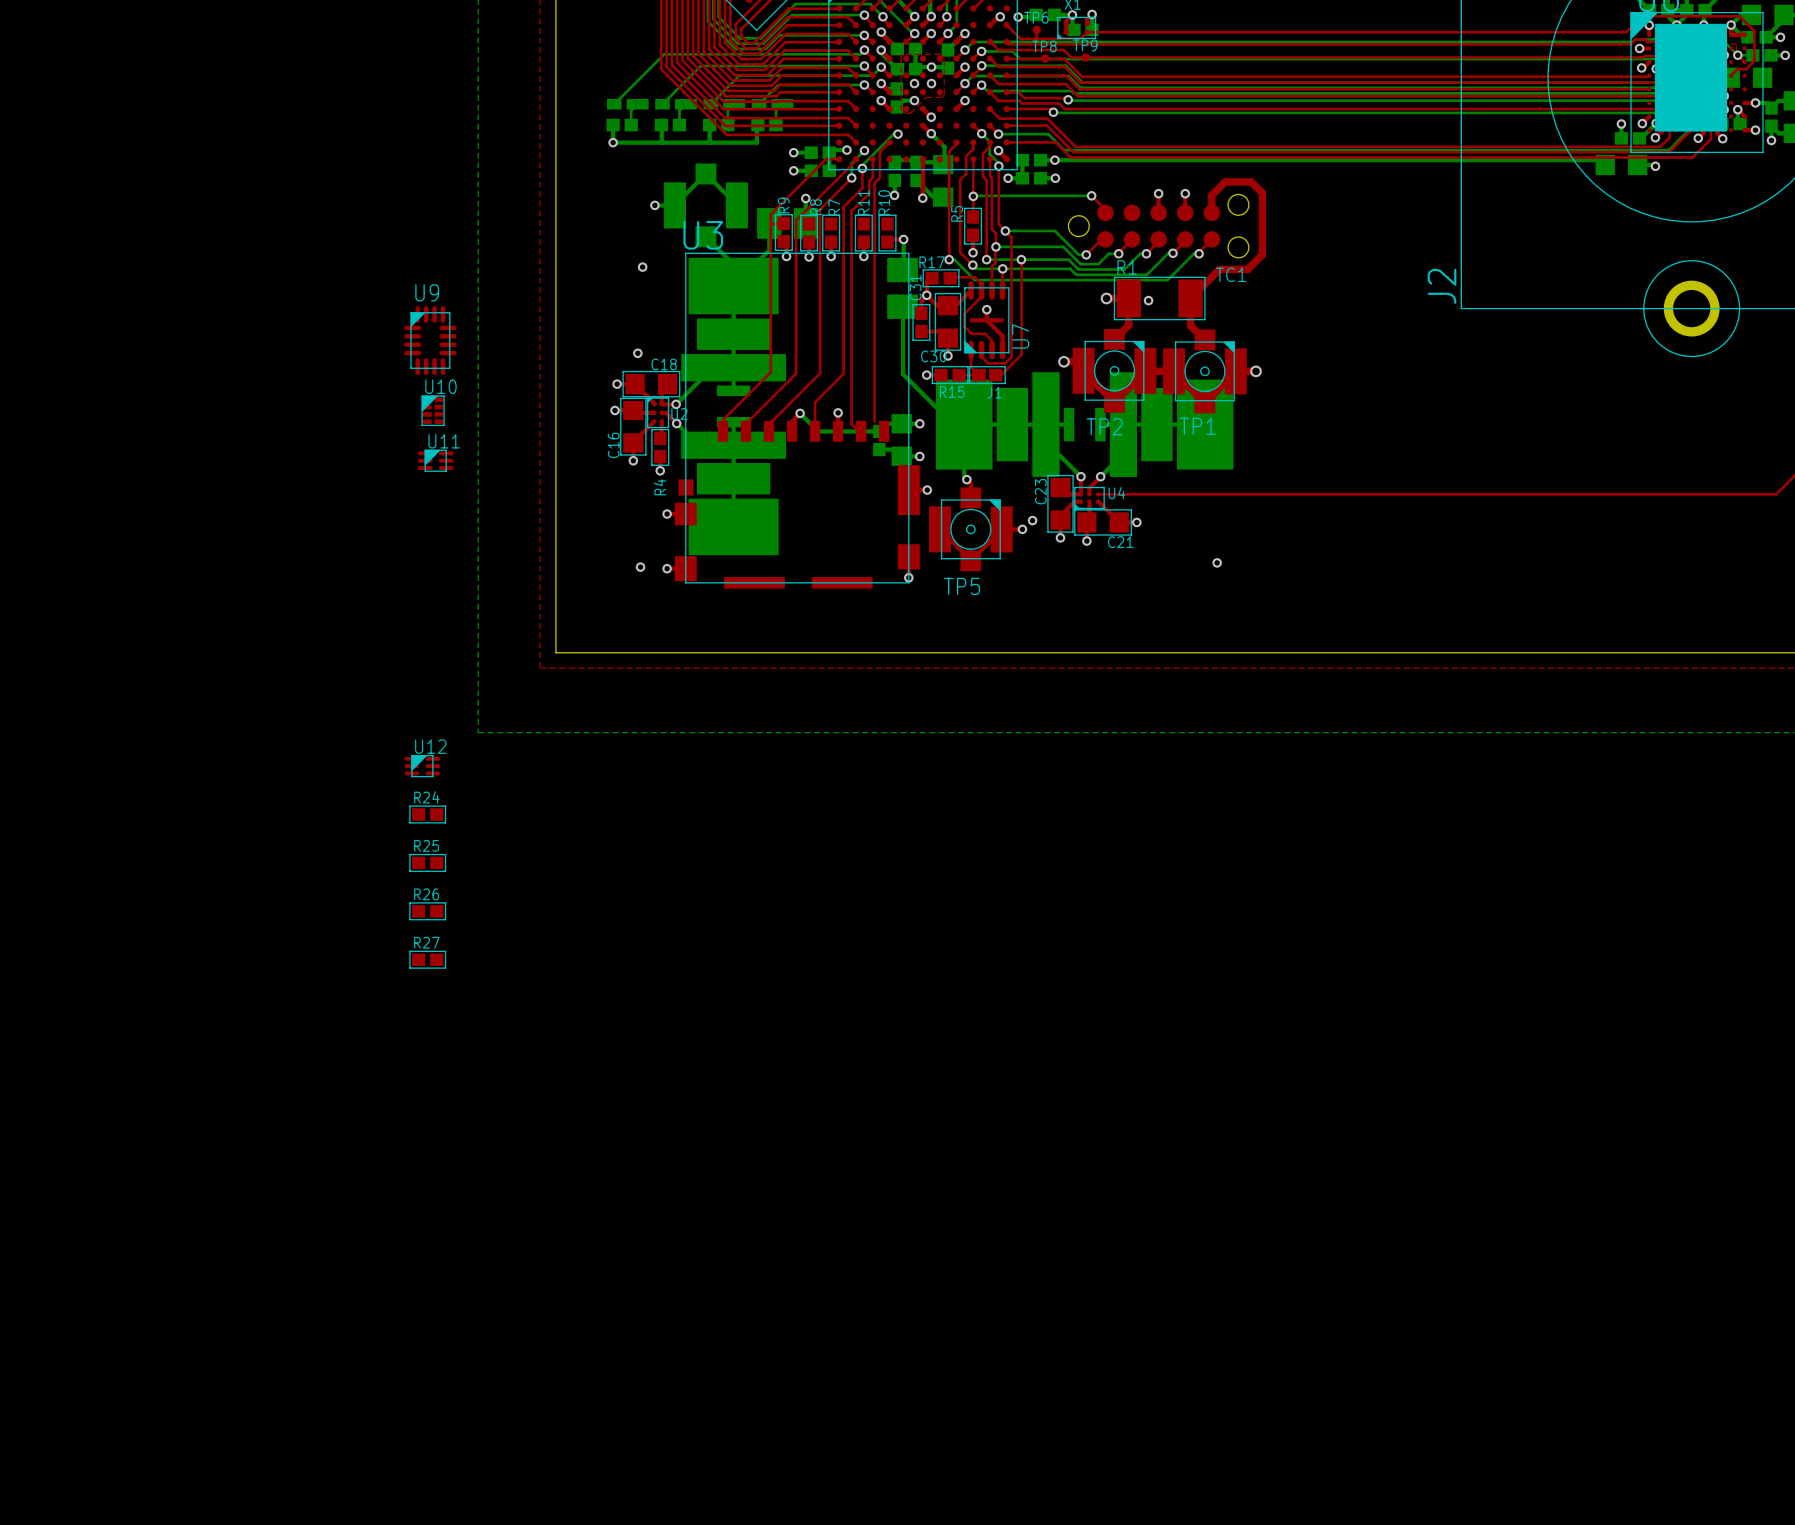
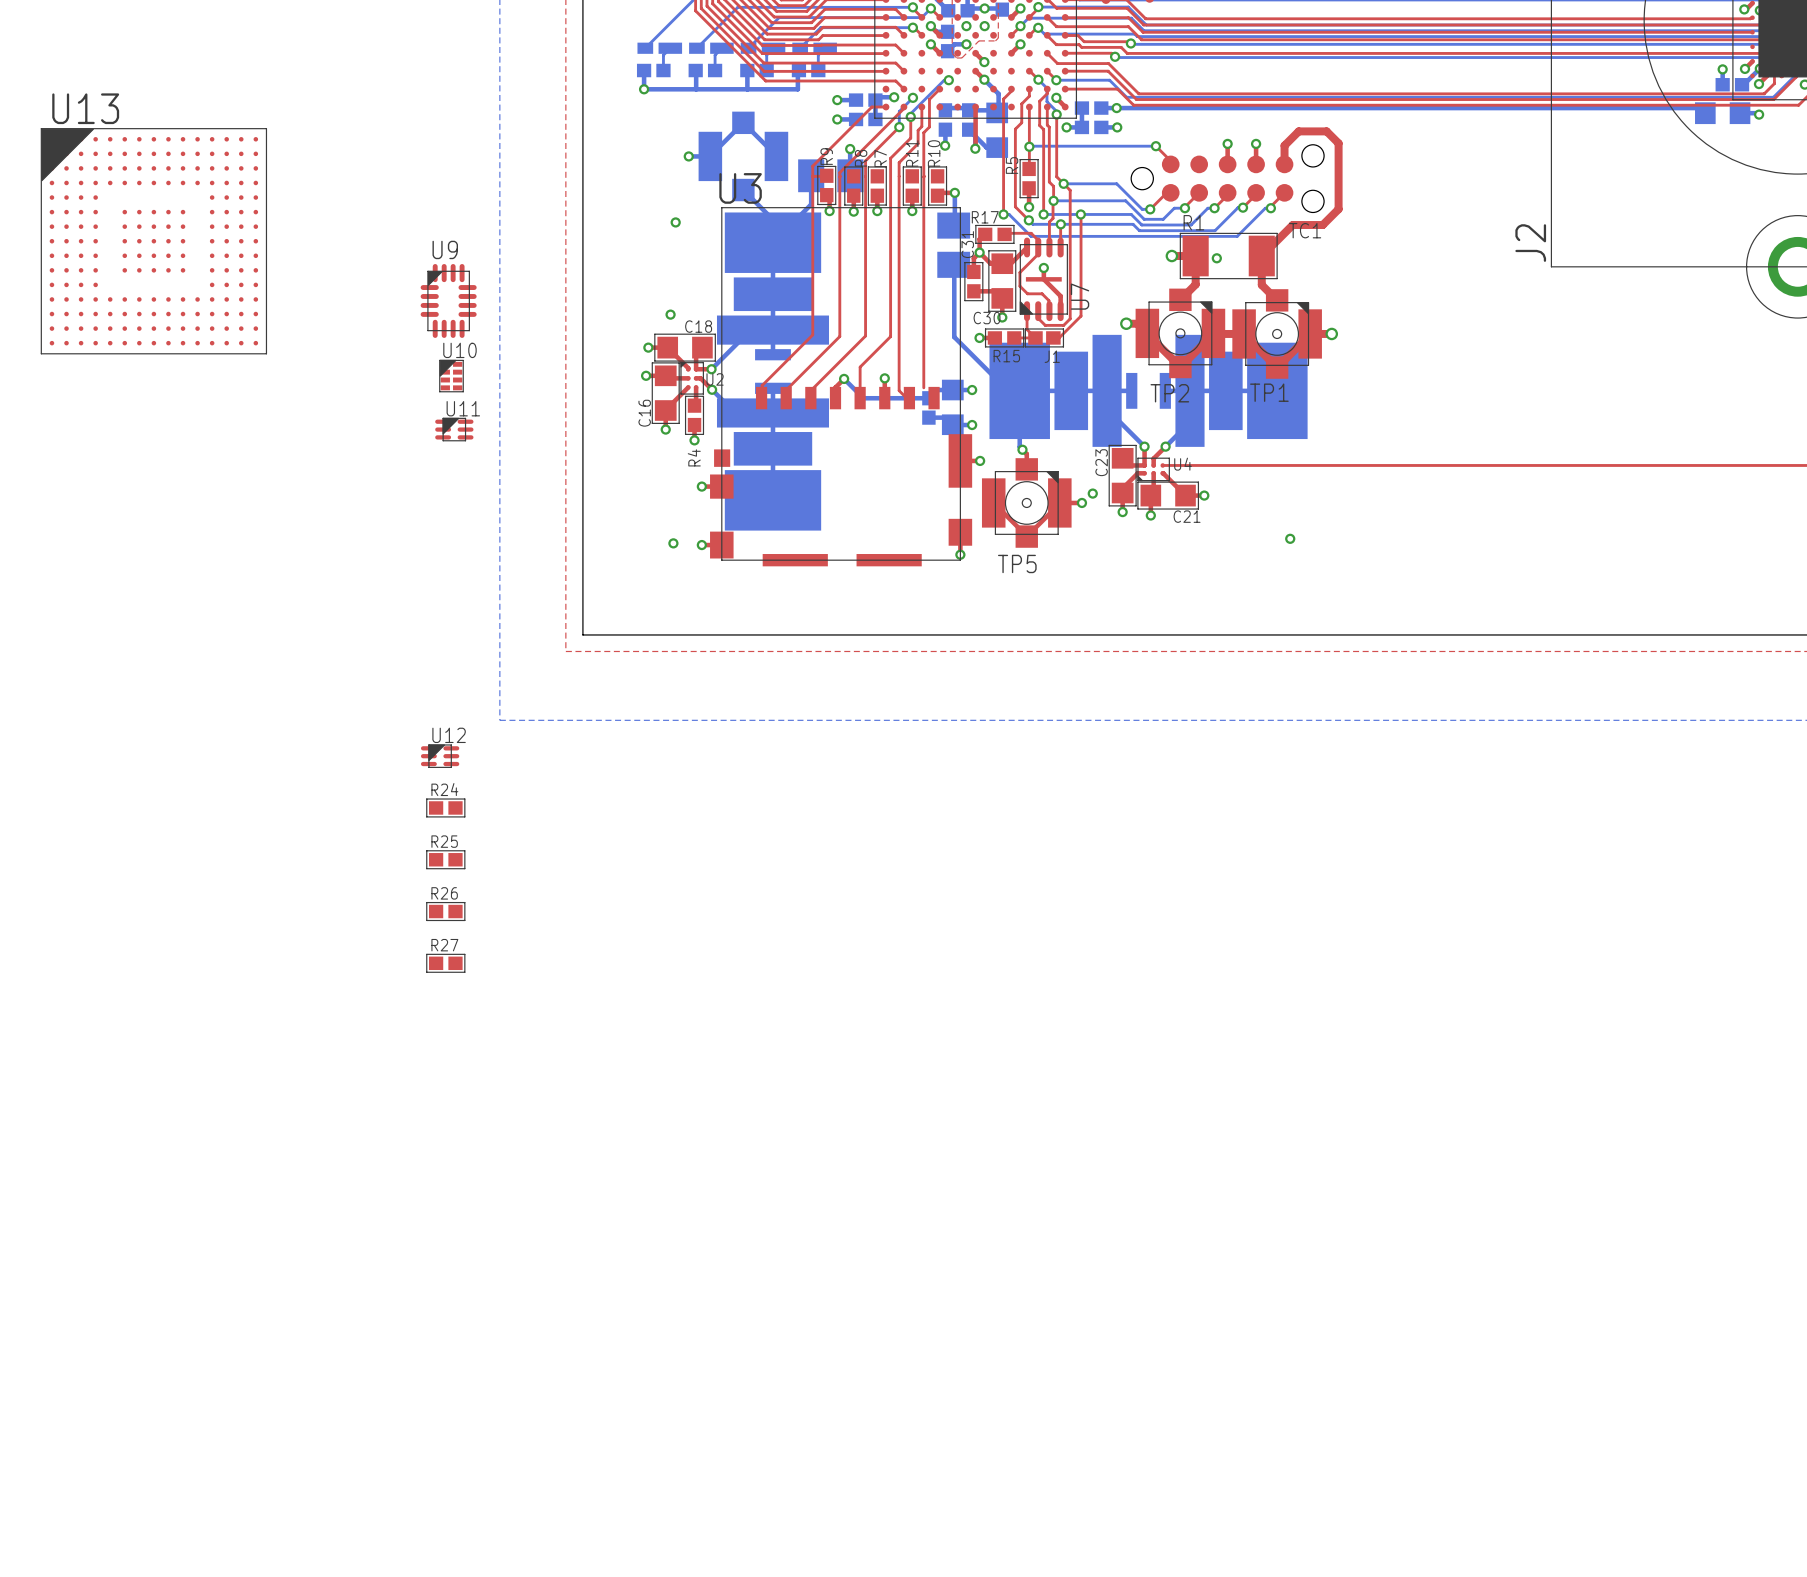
U13: none -> (153, 241)

